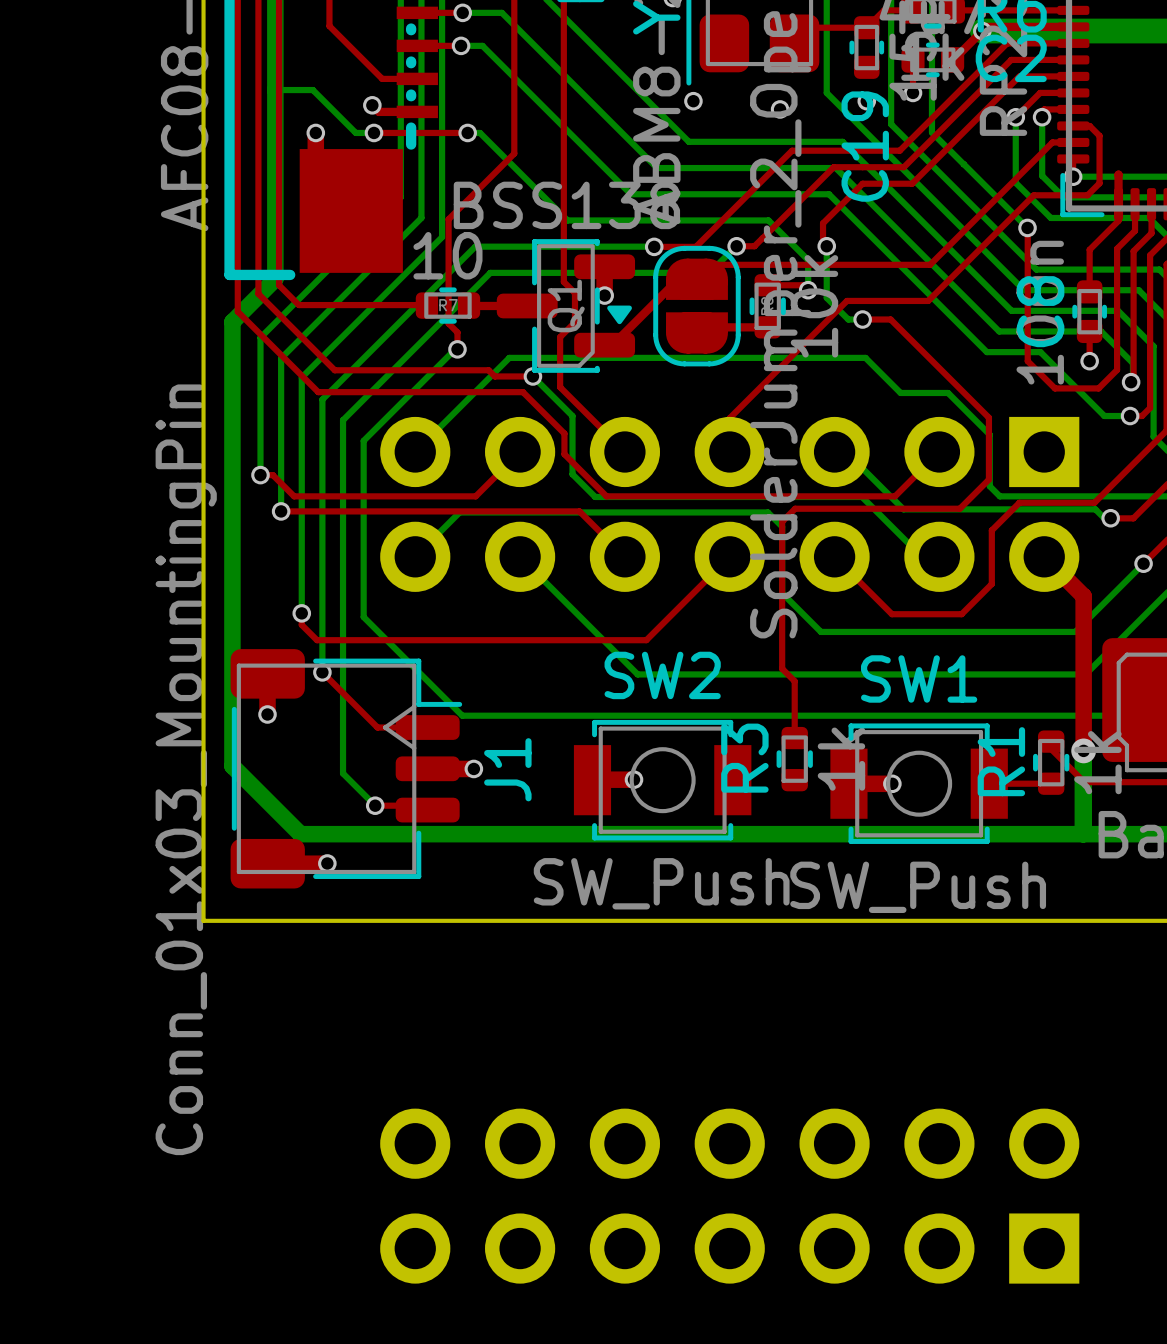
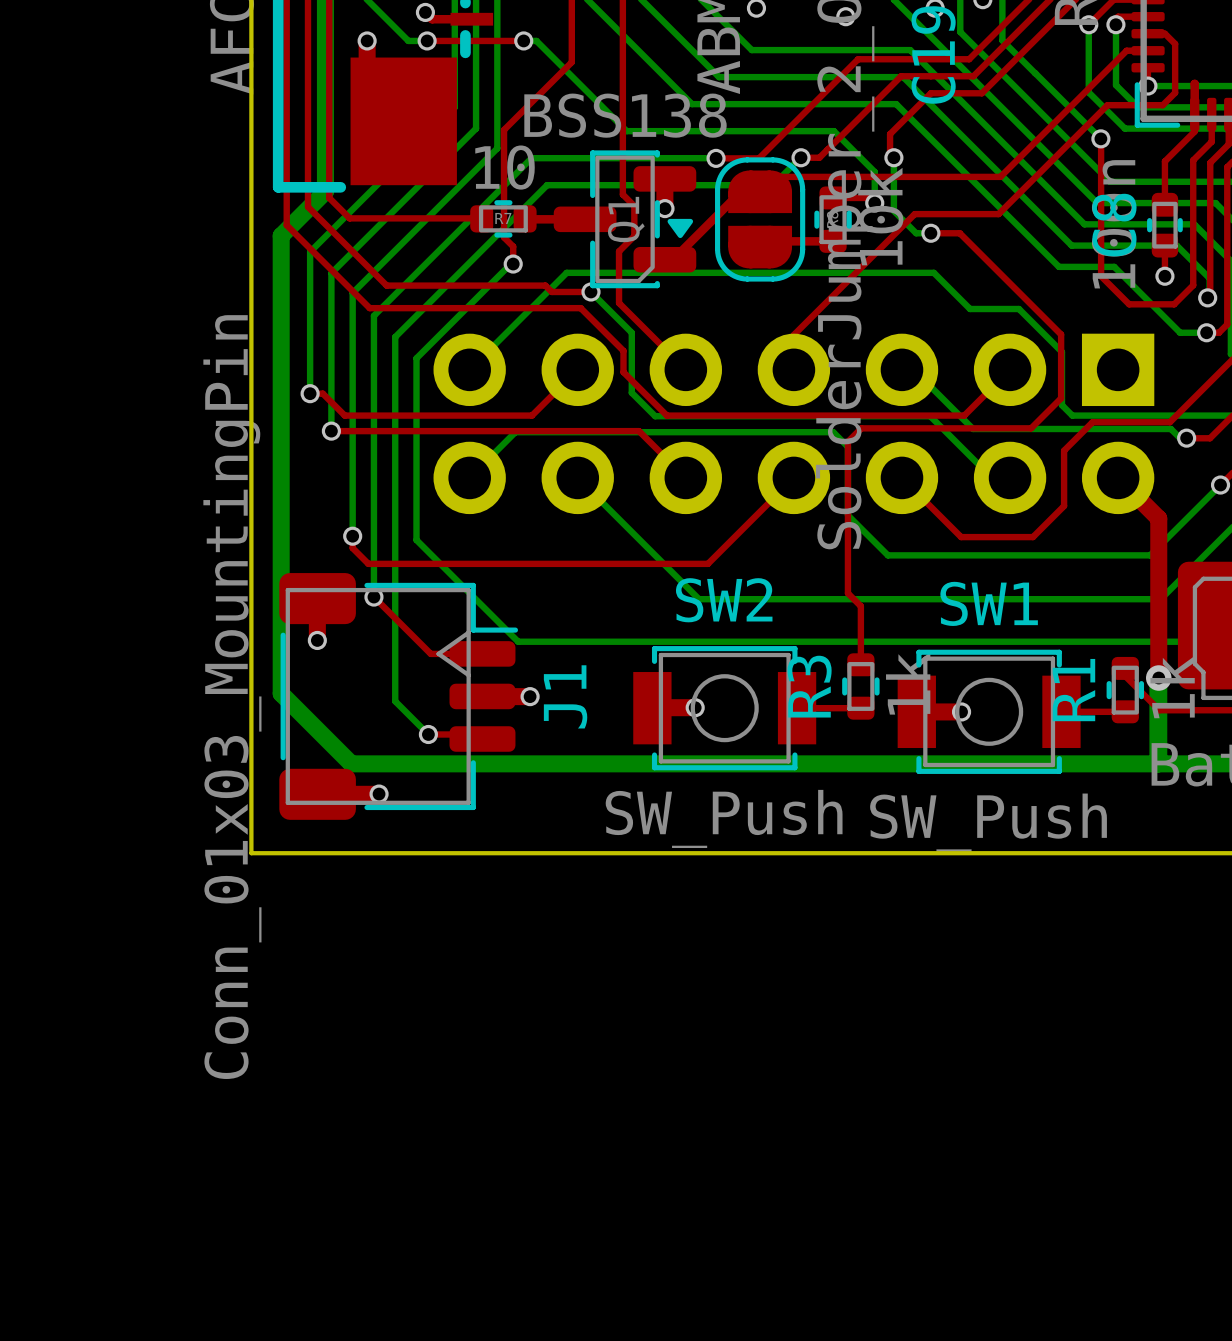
top track: none -> (797, 708) (860, 708)
part: (729, 1196) -> none

